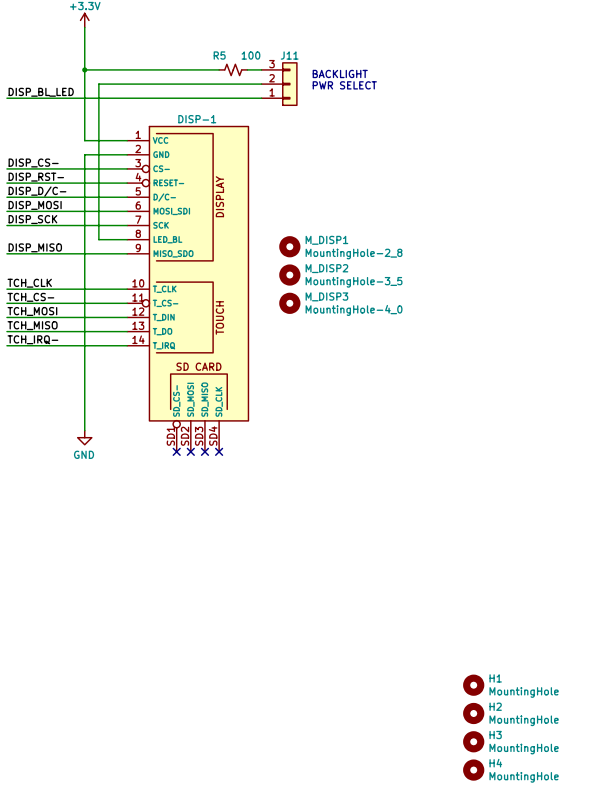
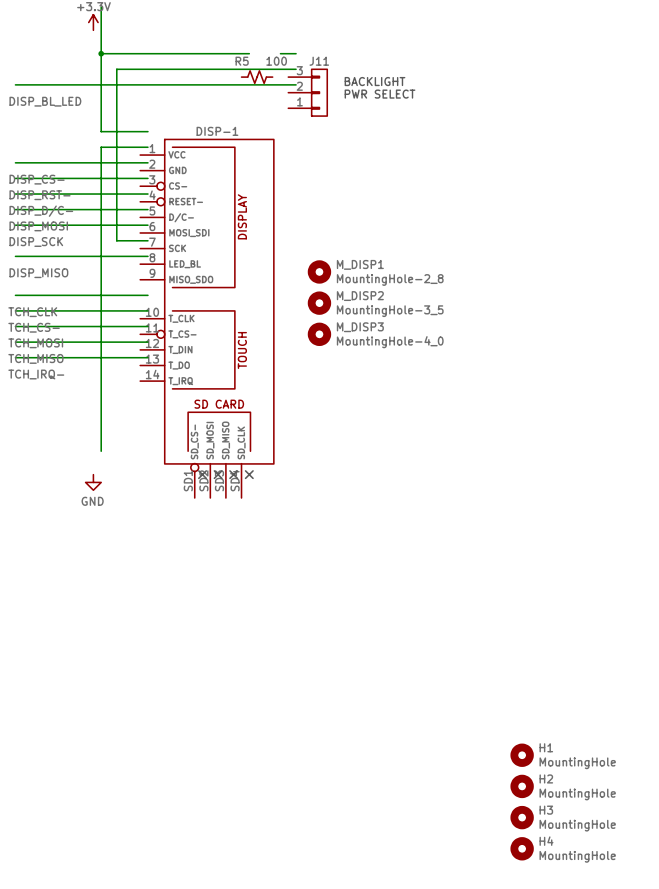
wire: (84, 27) (84, 140) (127, 140) -> (101, 6) (101, 131) (147, 131)
wire: (84, 69) (219, 69) -> (101, 53) (249, 53)
junction position: (84, 69) -> (101, 53)
wire: (247, 69) (261, 69) -> (280, 53) (296, 53)
wire: (261, 84) (98, 84) (98, 239) (127, 239) -> (296, 69) (116, 69) (116, 240) (147, 240)
wire: (6, 98) (261, 98) -> (15, 84) (296, 84)
wire: (127, 154) (84, 154) (84, 430) -> (147, 147) (101, 147) (101, 451)
wire: (6, 168) (127, 168) -> (15, 162) (147, 162)
wire: (6, 183) (127, 183) -> (15, 178) (147, 178)
wire: (6, 197) (127, 197) -> (15, 194) (147, 194)
wire: (6, 211) (127, 211) -> (15, 209) (147, 209)
wire: (6, 225) (127, 225) -> (15, 225) (147, 225)
wire: (6, 253) (127, 253) -> (15, 256) (147, 256)
wire: (6, 289) (127, 289) -> (15, 295) (147, 295)
wire: (6, 303) (127, 303) -> (15, 310) (147, 310)
wire: (6, 317) (127, 317) -> (15, 326) (147, 326)
wire: (6, 331) (127, 331) -> (15, 342) (147, 342)
wire: (6, 345) (127, 345) -> (15, 357) (147, 357)
no-connect mark: none -> (202, 474)
no-connect mark: none -> (218, 474)
no-connect mark: none -> (233, 474)
no-connect mark: none -> (249, 474)
no-connect mark: (176, 451) -> none
no-connect mark: (190, 451) -> none
no-connect mark: (204, 451) -> none
no-connect mark: (219, 451) -> none

